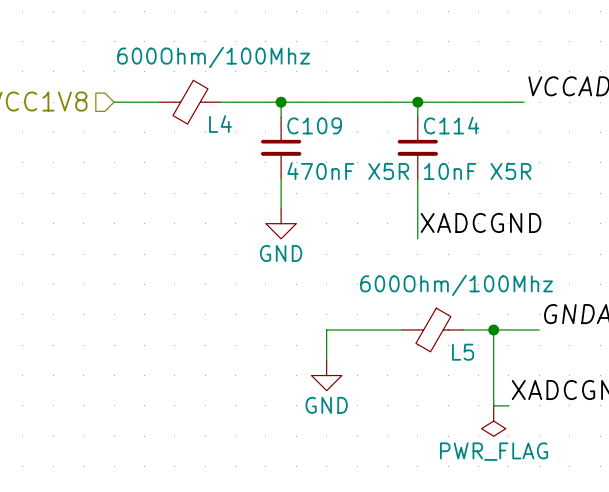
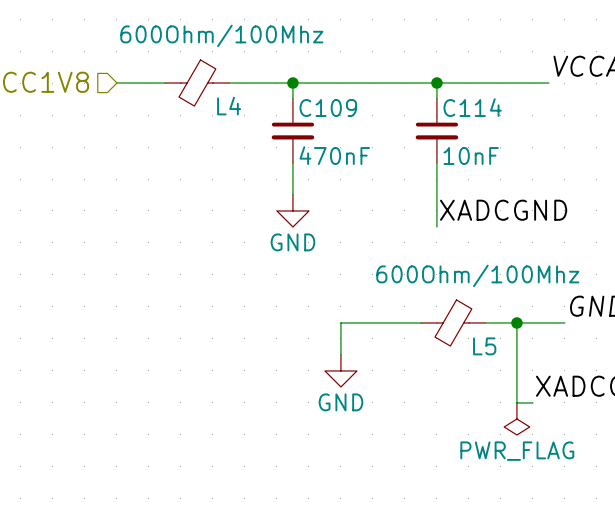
C109 value: 470nF X5R (348, 171) -> 470nF (334, 155)
C114 value: 10nF X5R (477, 171) -> 10nF (471, 156)

